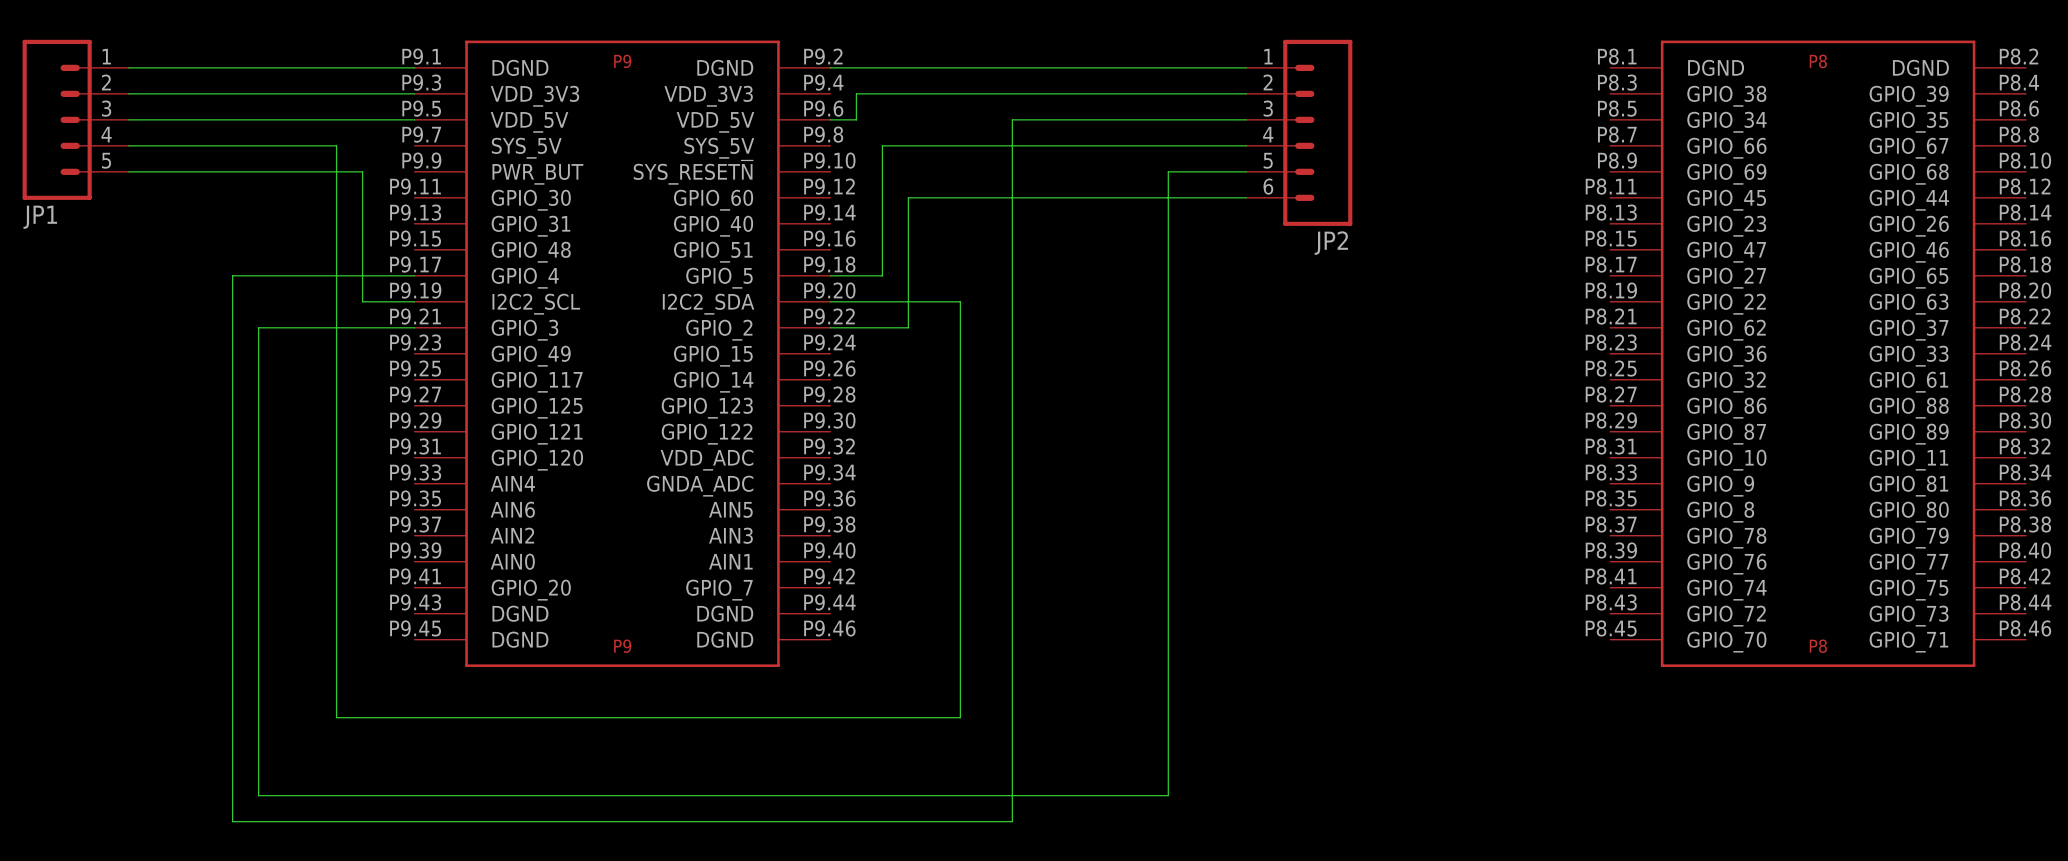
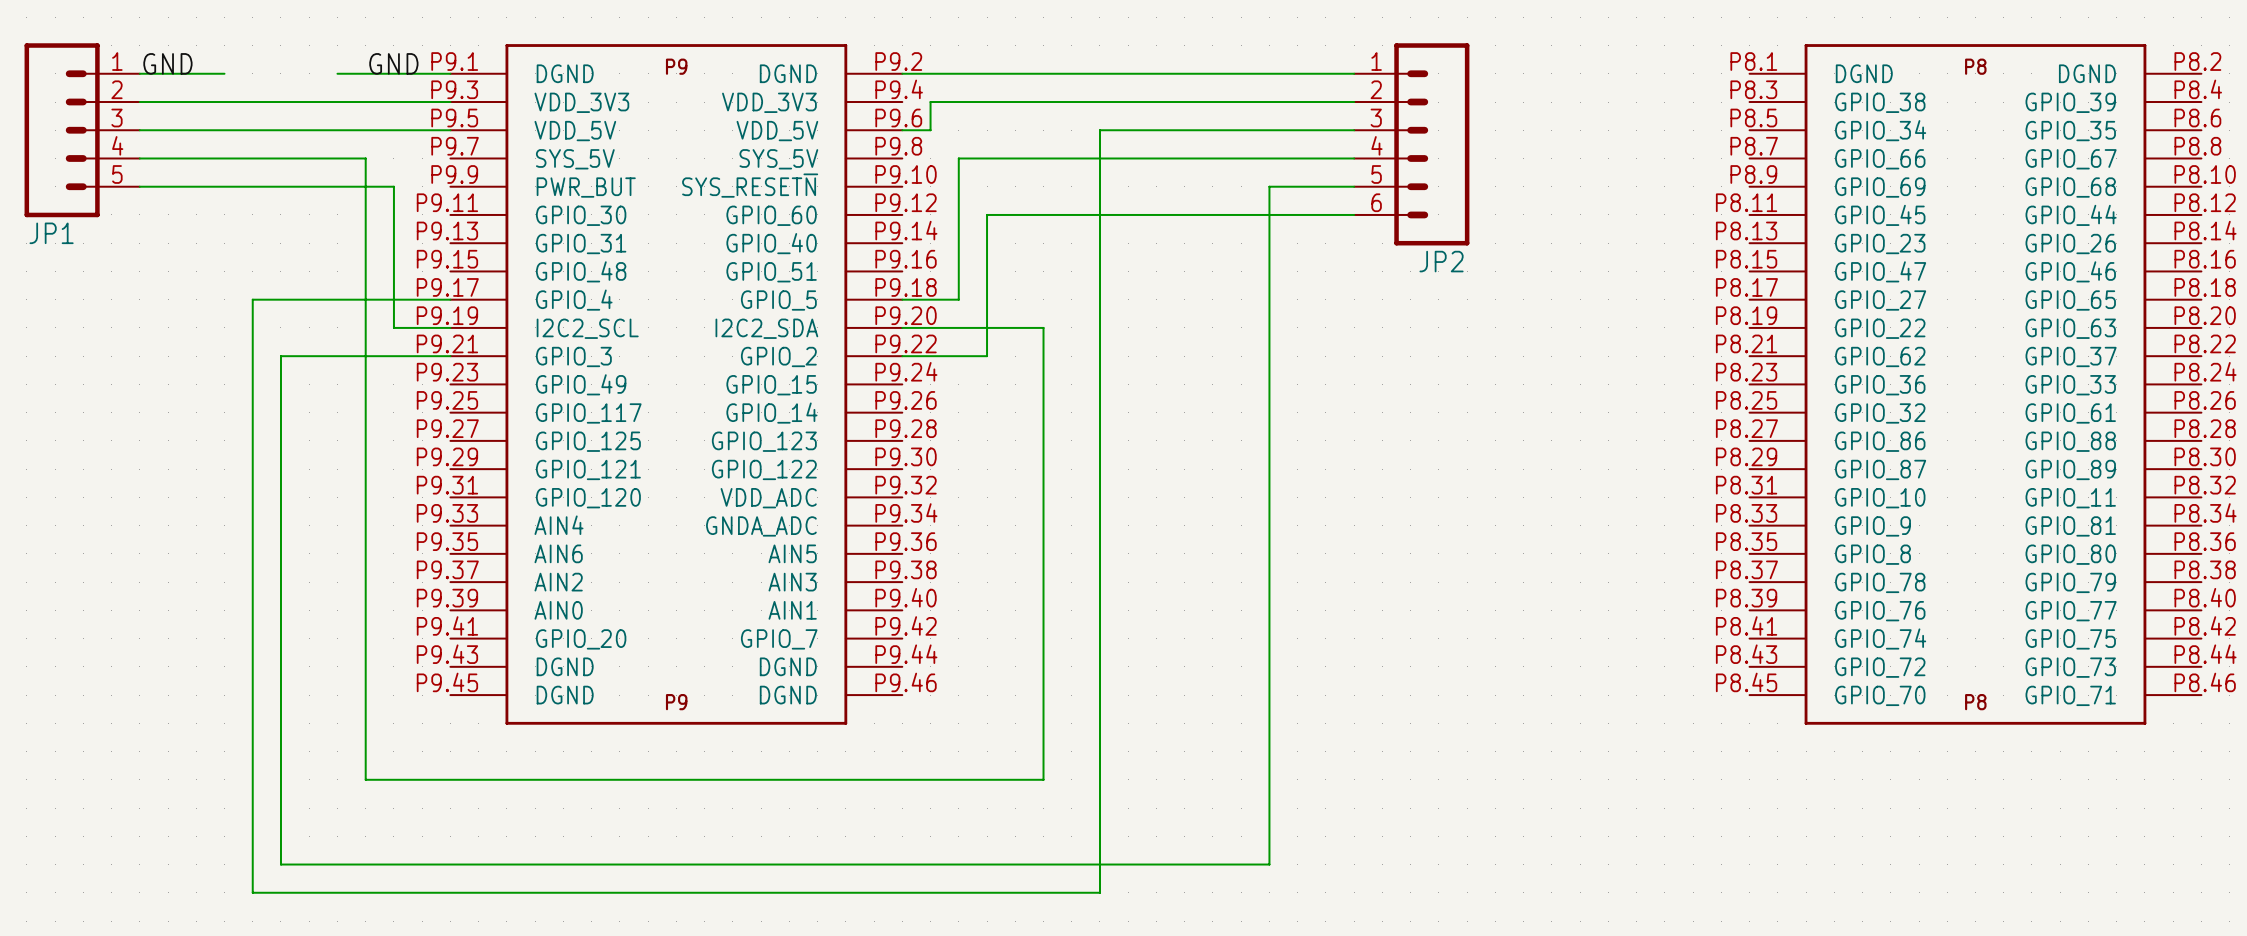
label: none -> GND (167, 63)
label: none -> GND (393, 63)
wire: (206, 67) (310, 67) -> none

